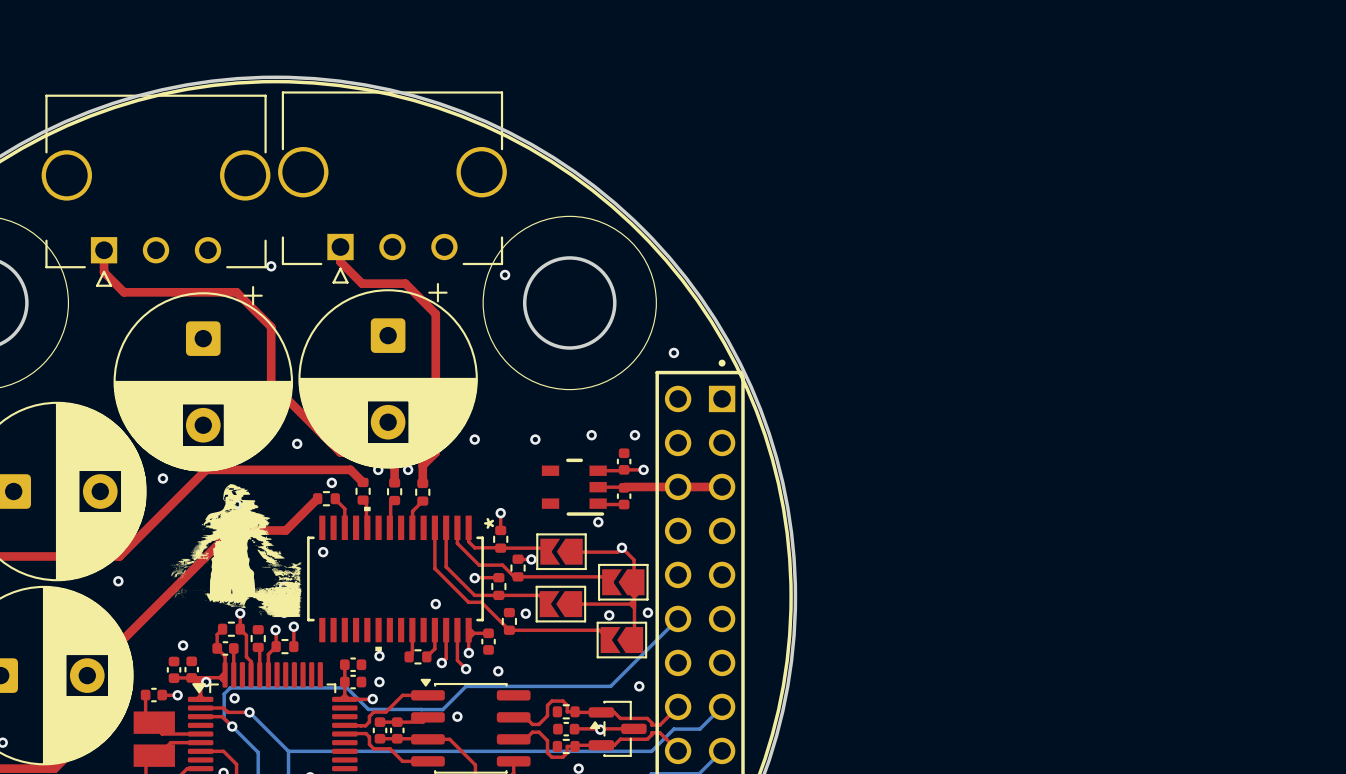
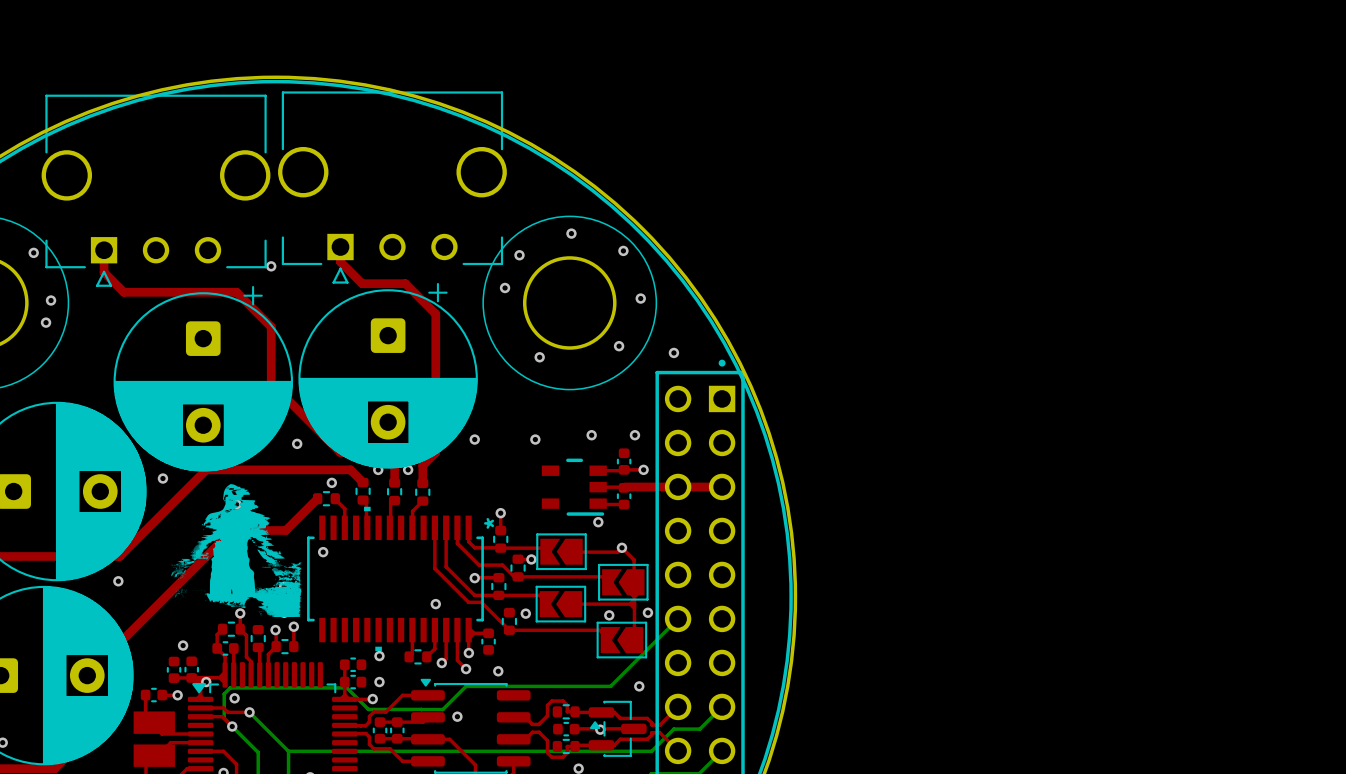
via: none -> (571, 233)
via: none -> (623, 250)
via: none -> (33, 252)
via: none -> (519, 255)
via: (505, 274) -> none
via: none -> (505, 287)
via: none -> (640, 298)
via: none -> (51, 300)
via: none -> (46, 322)
via: none -> (619, 346)
via: none -> (539, 357)

